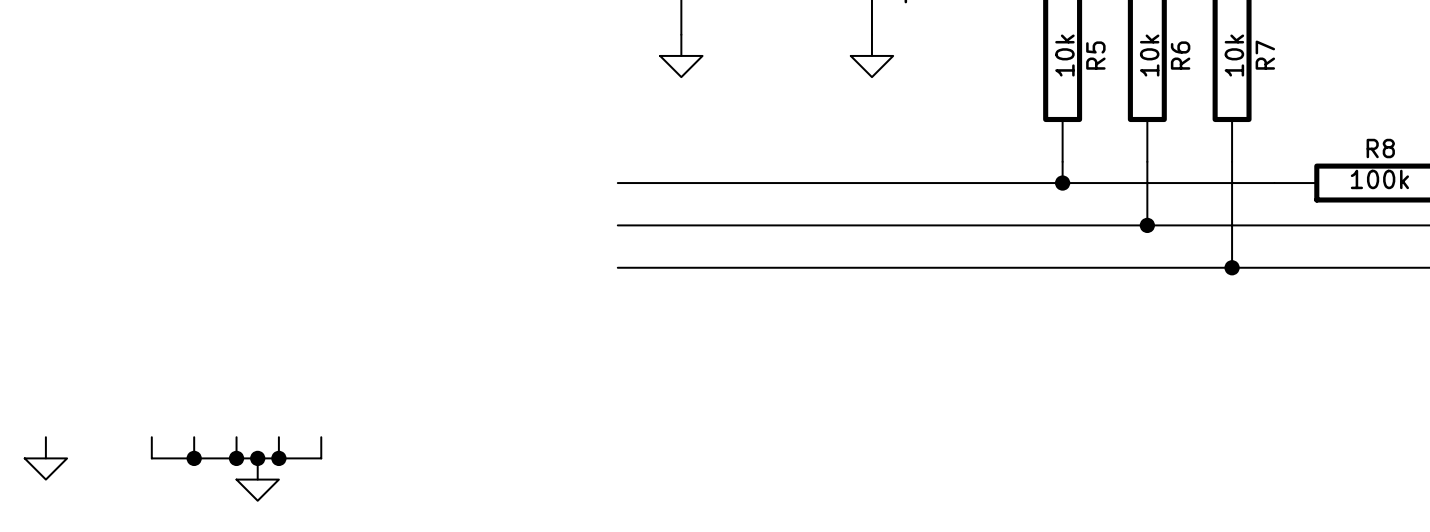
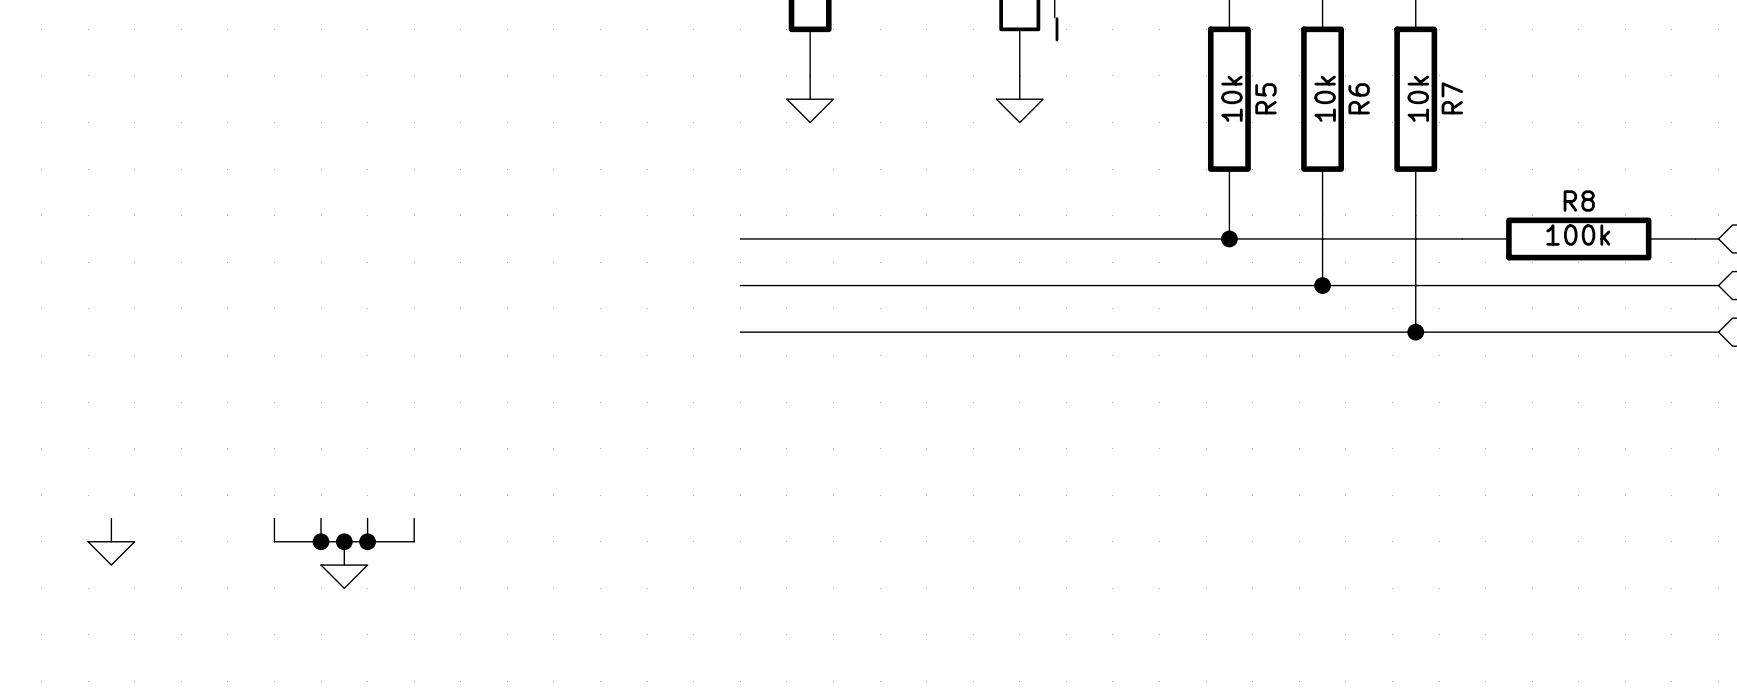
wire: (151, 437) (151, 458) (194, 458) -> none
junction: (194, 458) -> none

